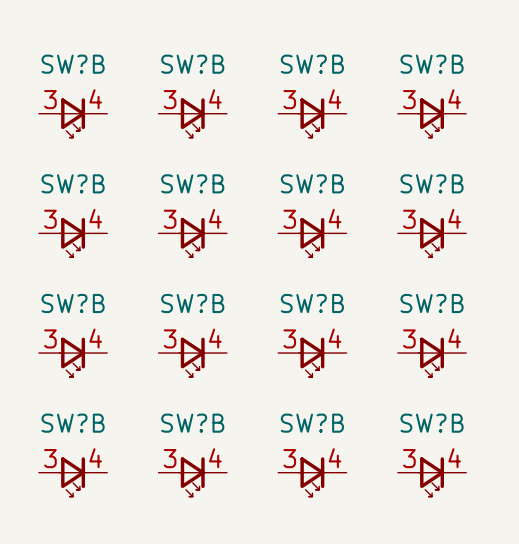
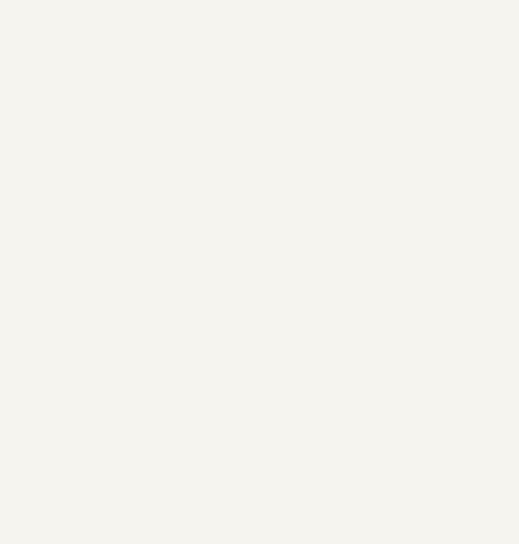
SW?B: (73, 117) -> none
SW?B: (192, 117) -> none
SW?B: (312, 117) -> none
SW?B: (432, 117) -> none
SW?B: (73, 237) -> none
SW?B: (192, 237) -> none
SW?B: (312, 237) -> none
SW?B: (432, 237) -> none
SW?B: (73, 357) -> none
SW?B: (192, 357) -> none
SW?B: (312, 357) -> none
SW?B: (432, 357) -> none
SW?B: (73, 476) -> none
SW?B: (192, 476) -> none
SW?B: (312, 476) -> none
SW?B: (432, 476) -> none

